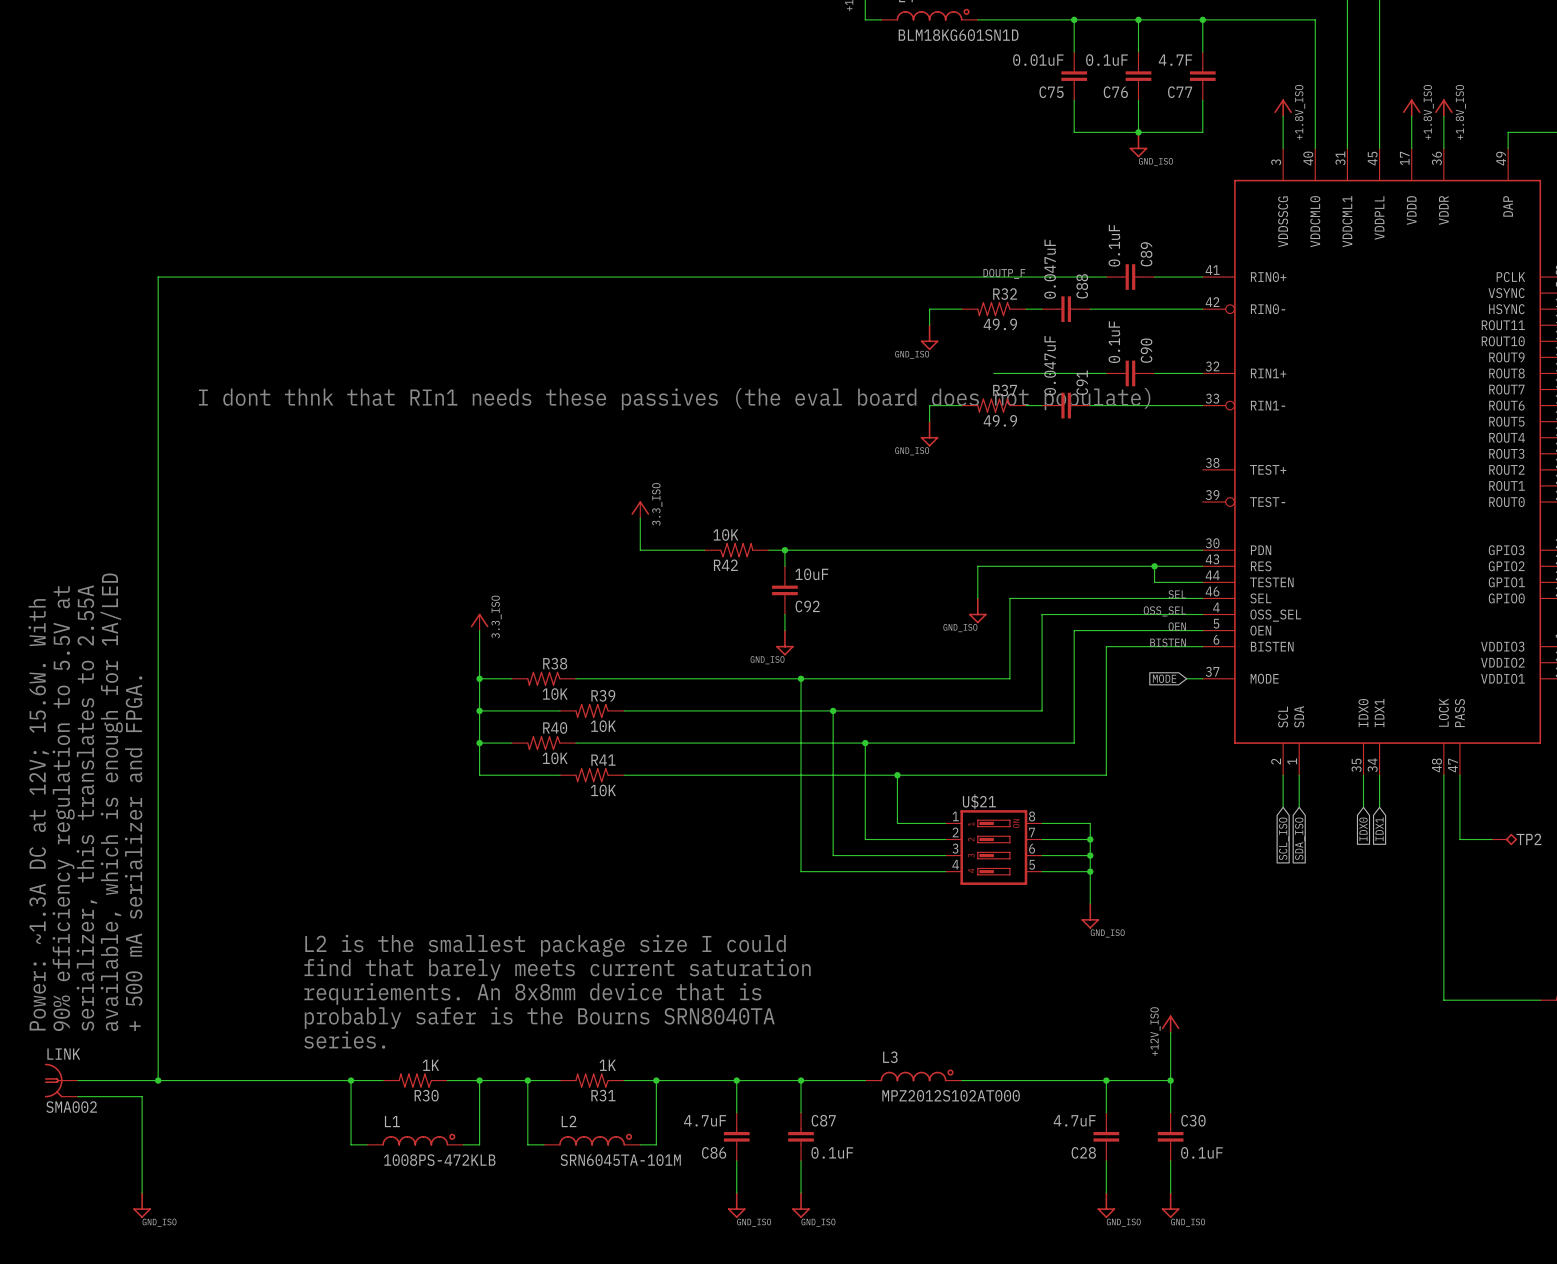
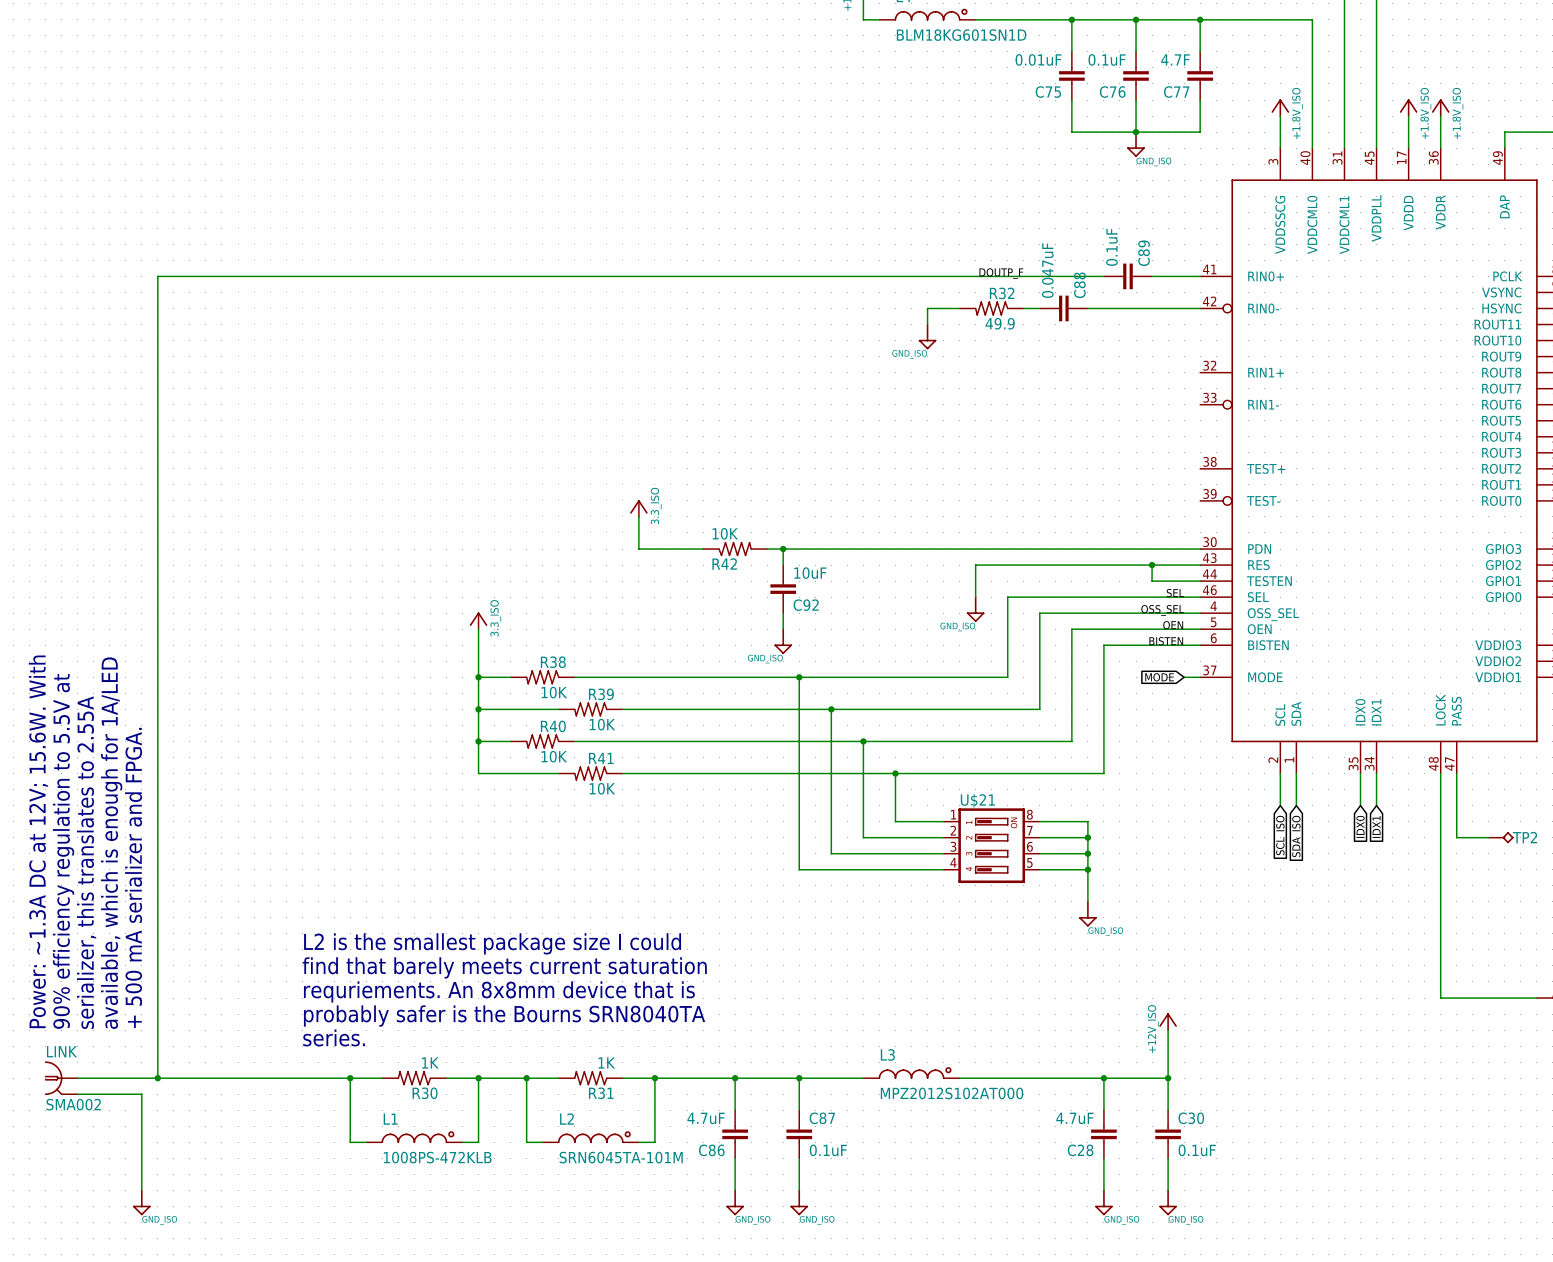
wire: (993, 373) (1106, 373) -> none
C90: 0.1uF (1130, 373) -> none
wire: (1154, 373) (1202, 373) -> none
text: I dont thnk that RIn1 needs these passives (the eval board does not populate) (674, 399) -> none
wire: (961, 405) (929, 405) (929, 421) -> none
R37: 49.9 (993, 405) -> none
wire: (1026, 405) (1042, 405) -> none
C91: 0.047uF (1066, 405) -> none
wire: (1090, 405) (1202, 405) -> none
power symbol: (929, 433) -> none

